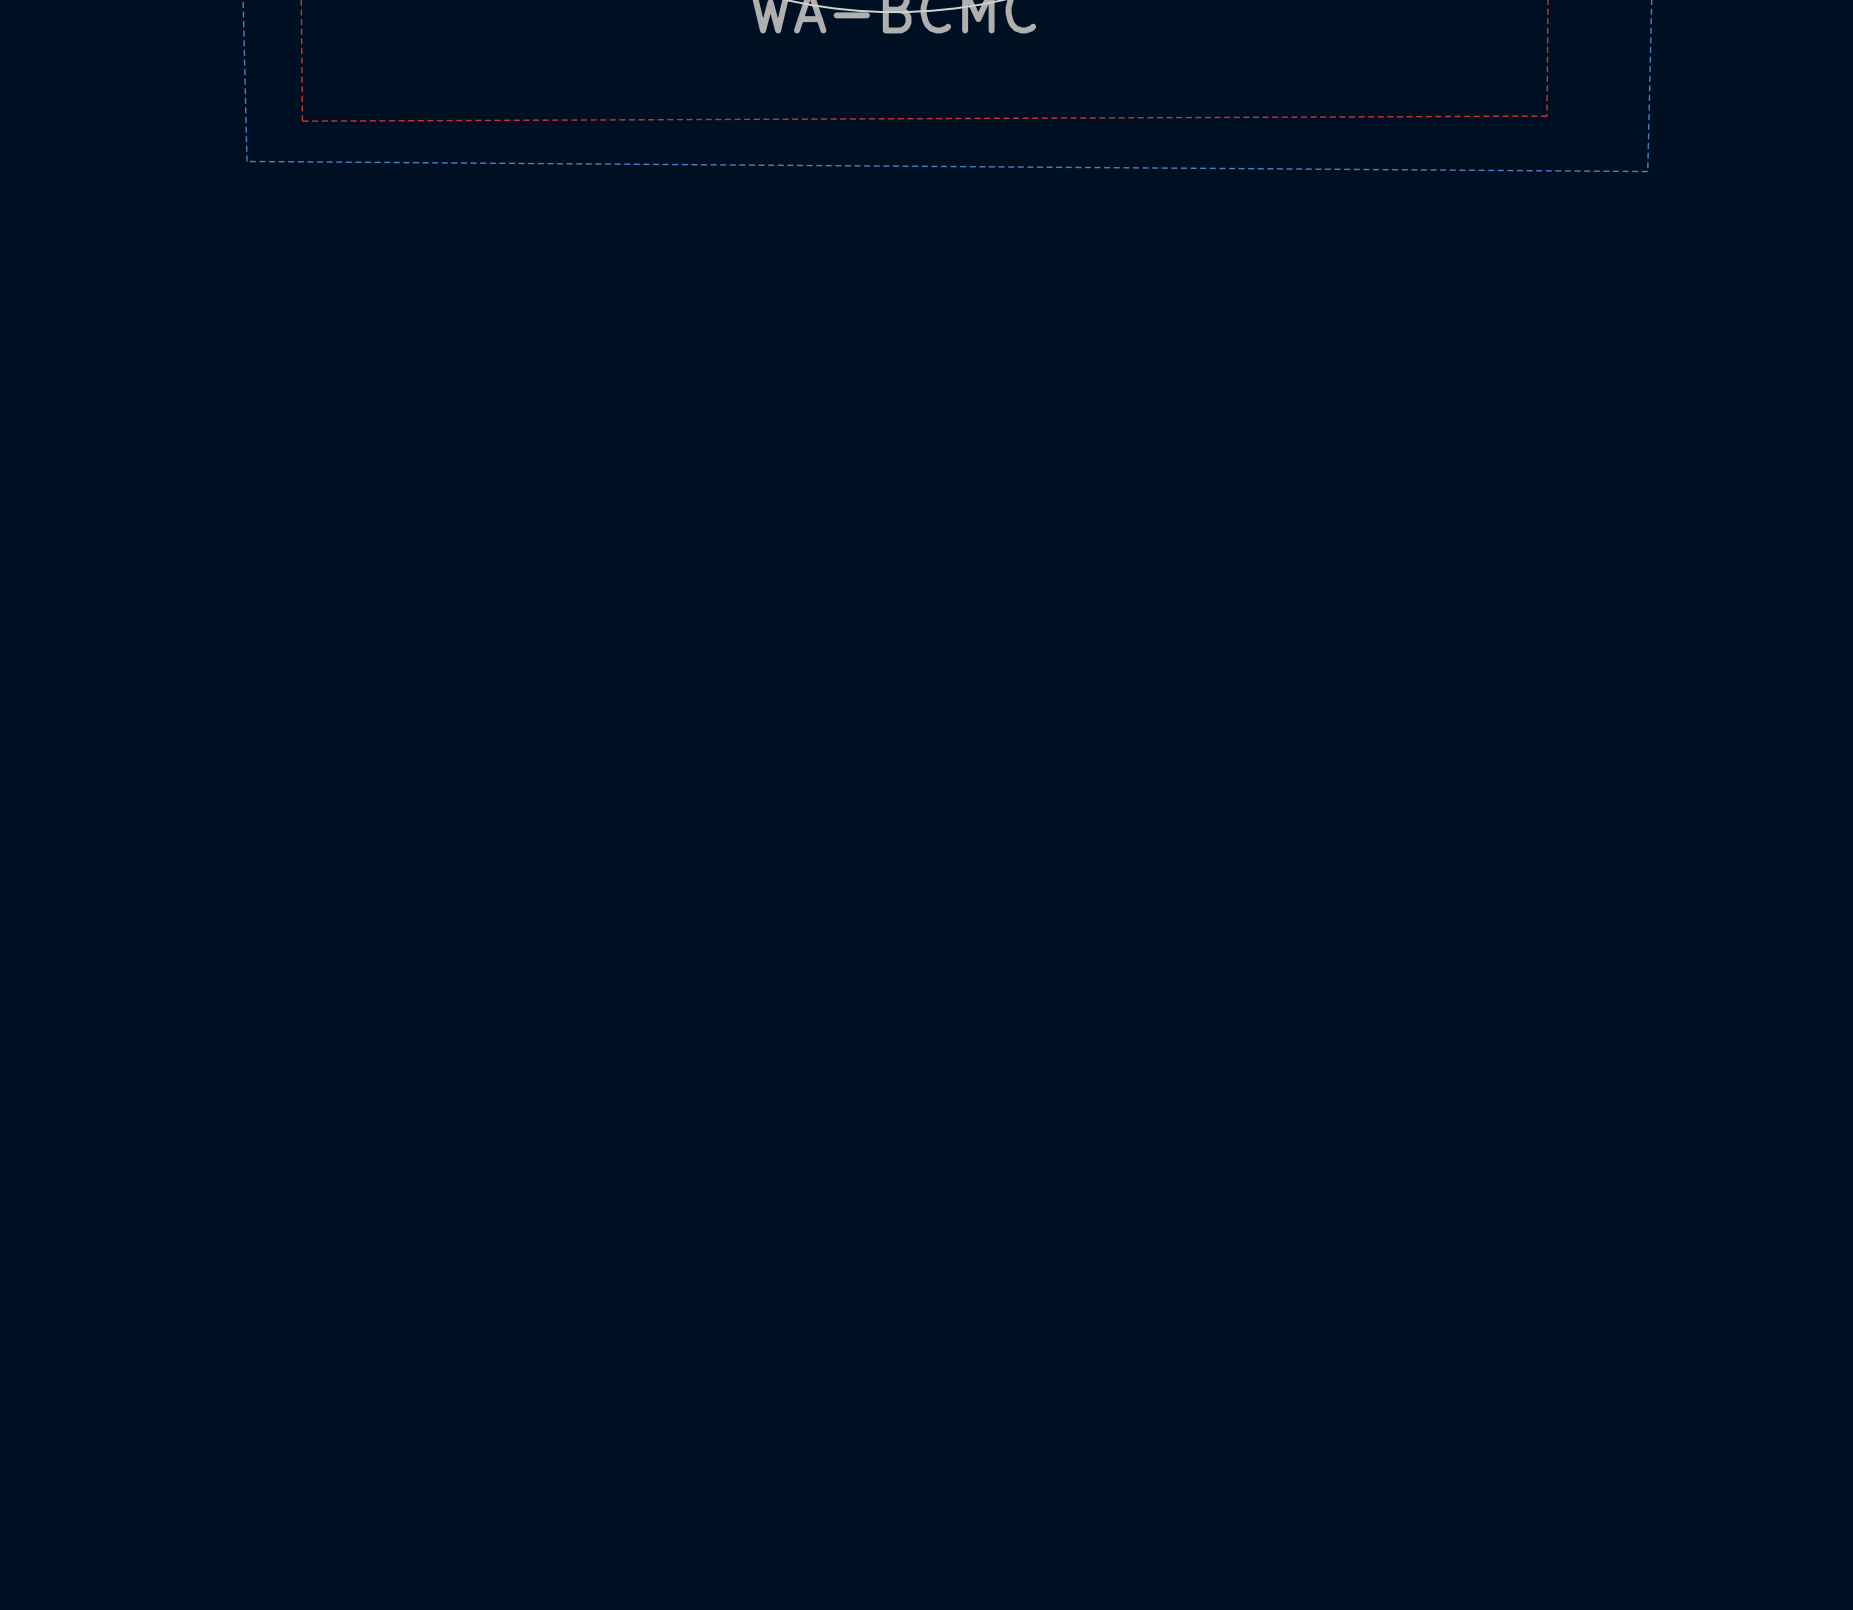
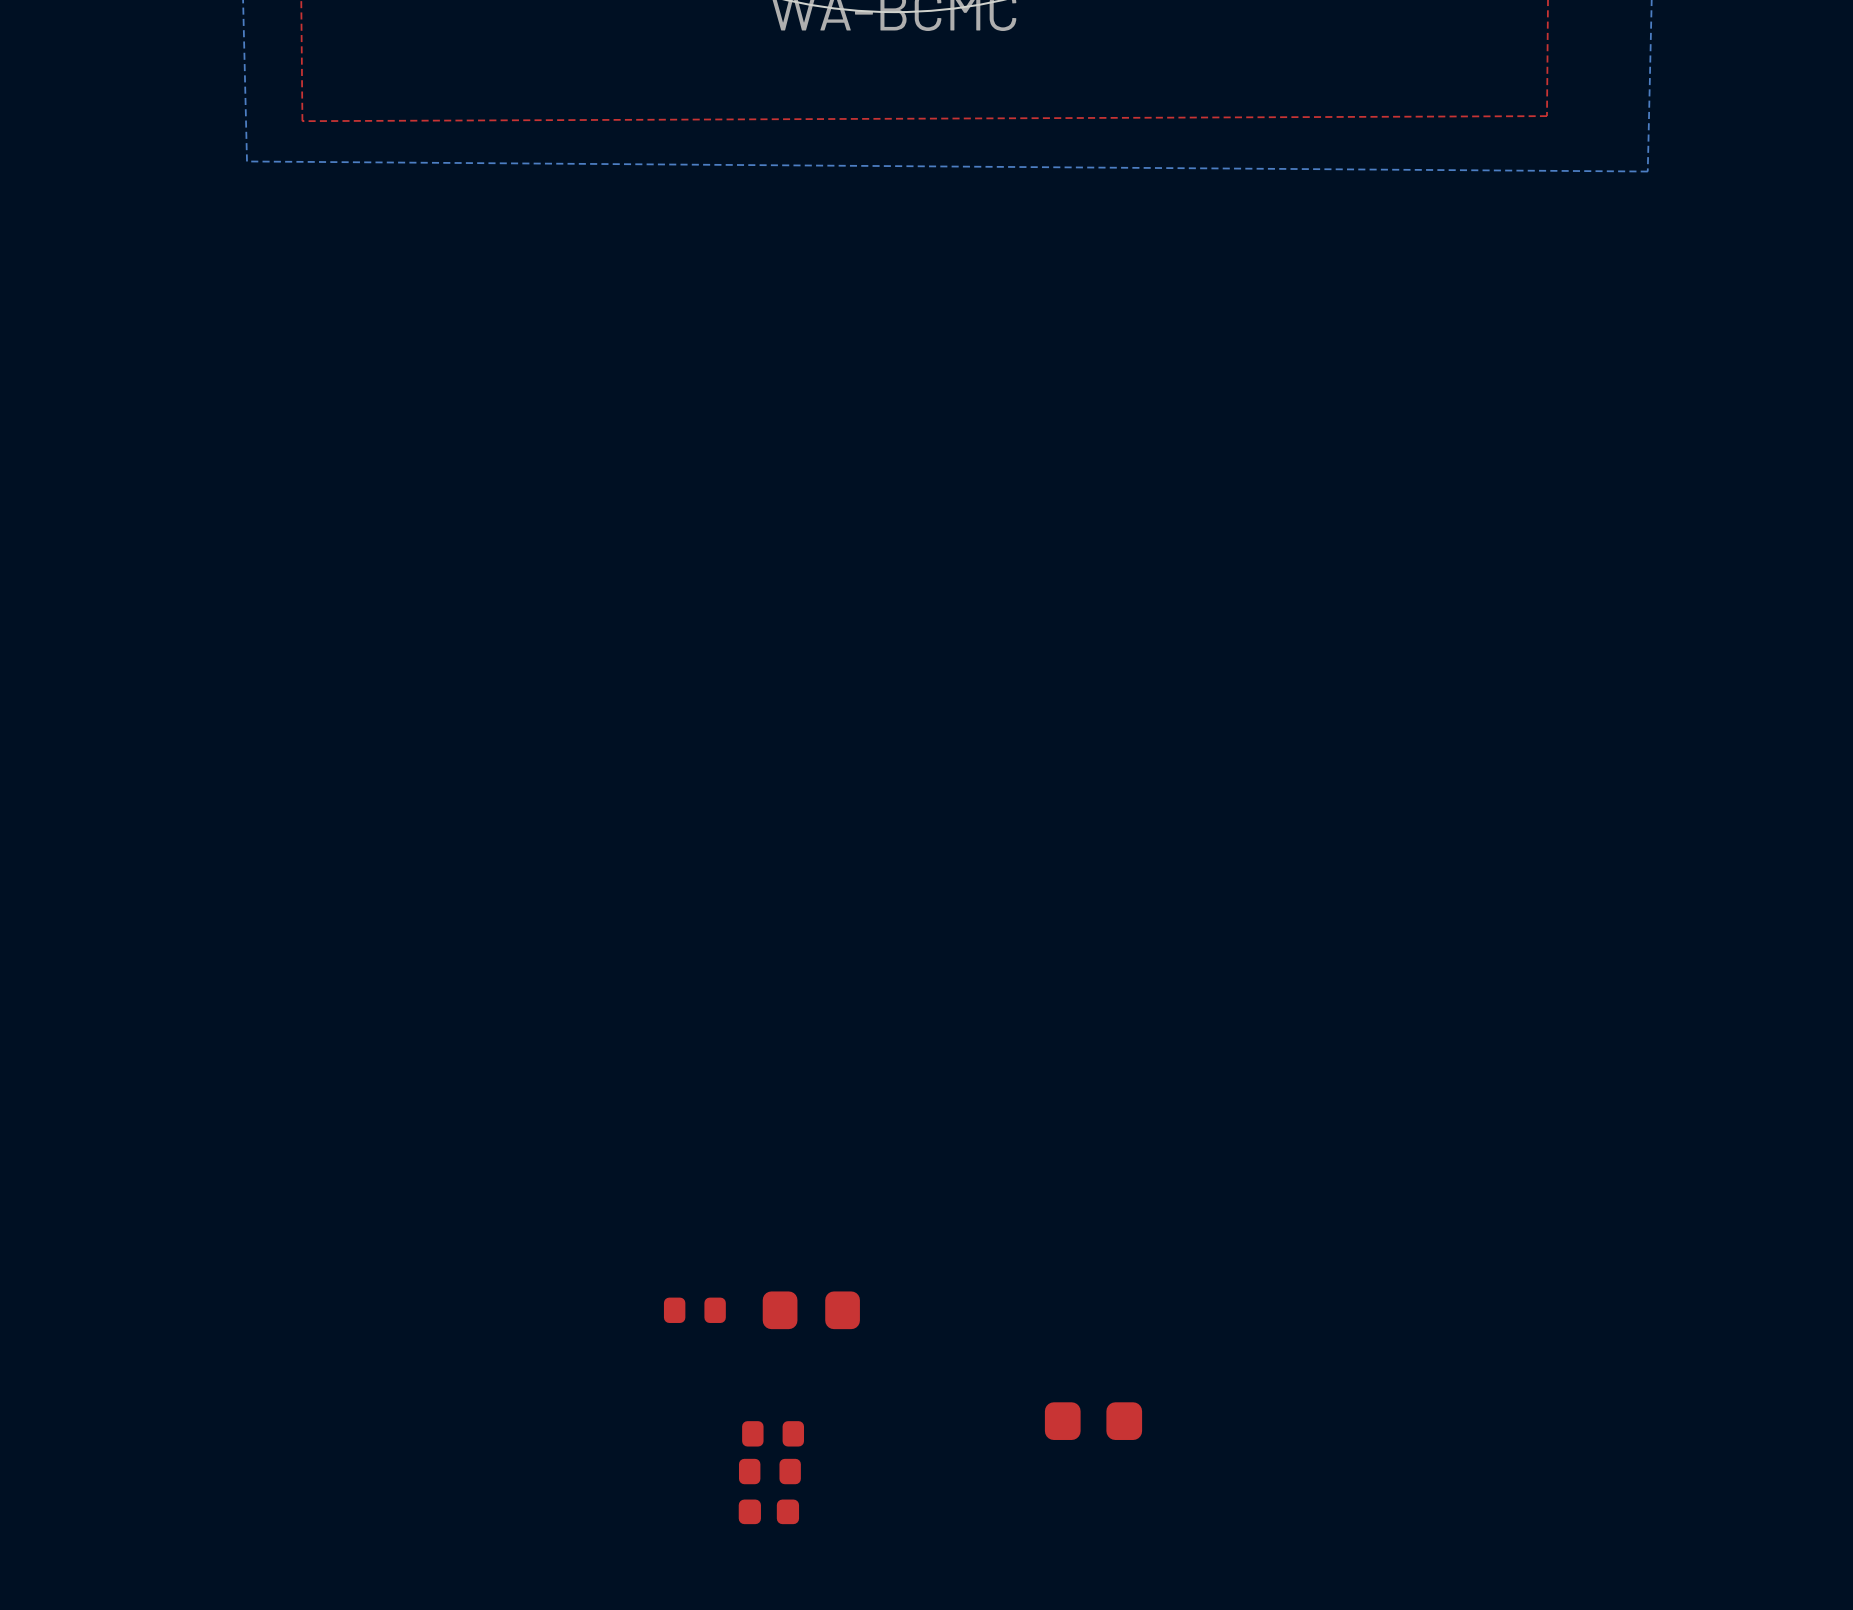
part: none -> (694, 1310)
part: none -> (811, 1310)
part: none -> (1093, 1421)
part: none -> (773, 1433)
part: none -> (769, 1471)
part: none -> (768, 1511)

